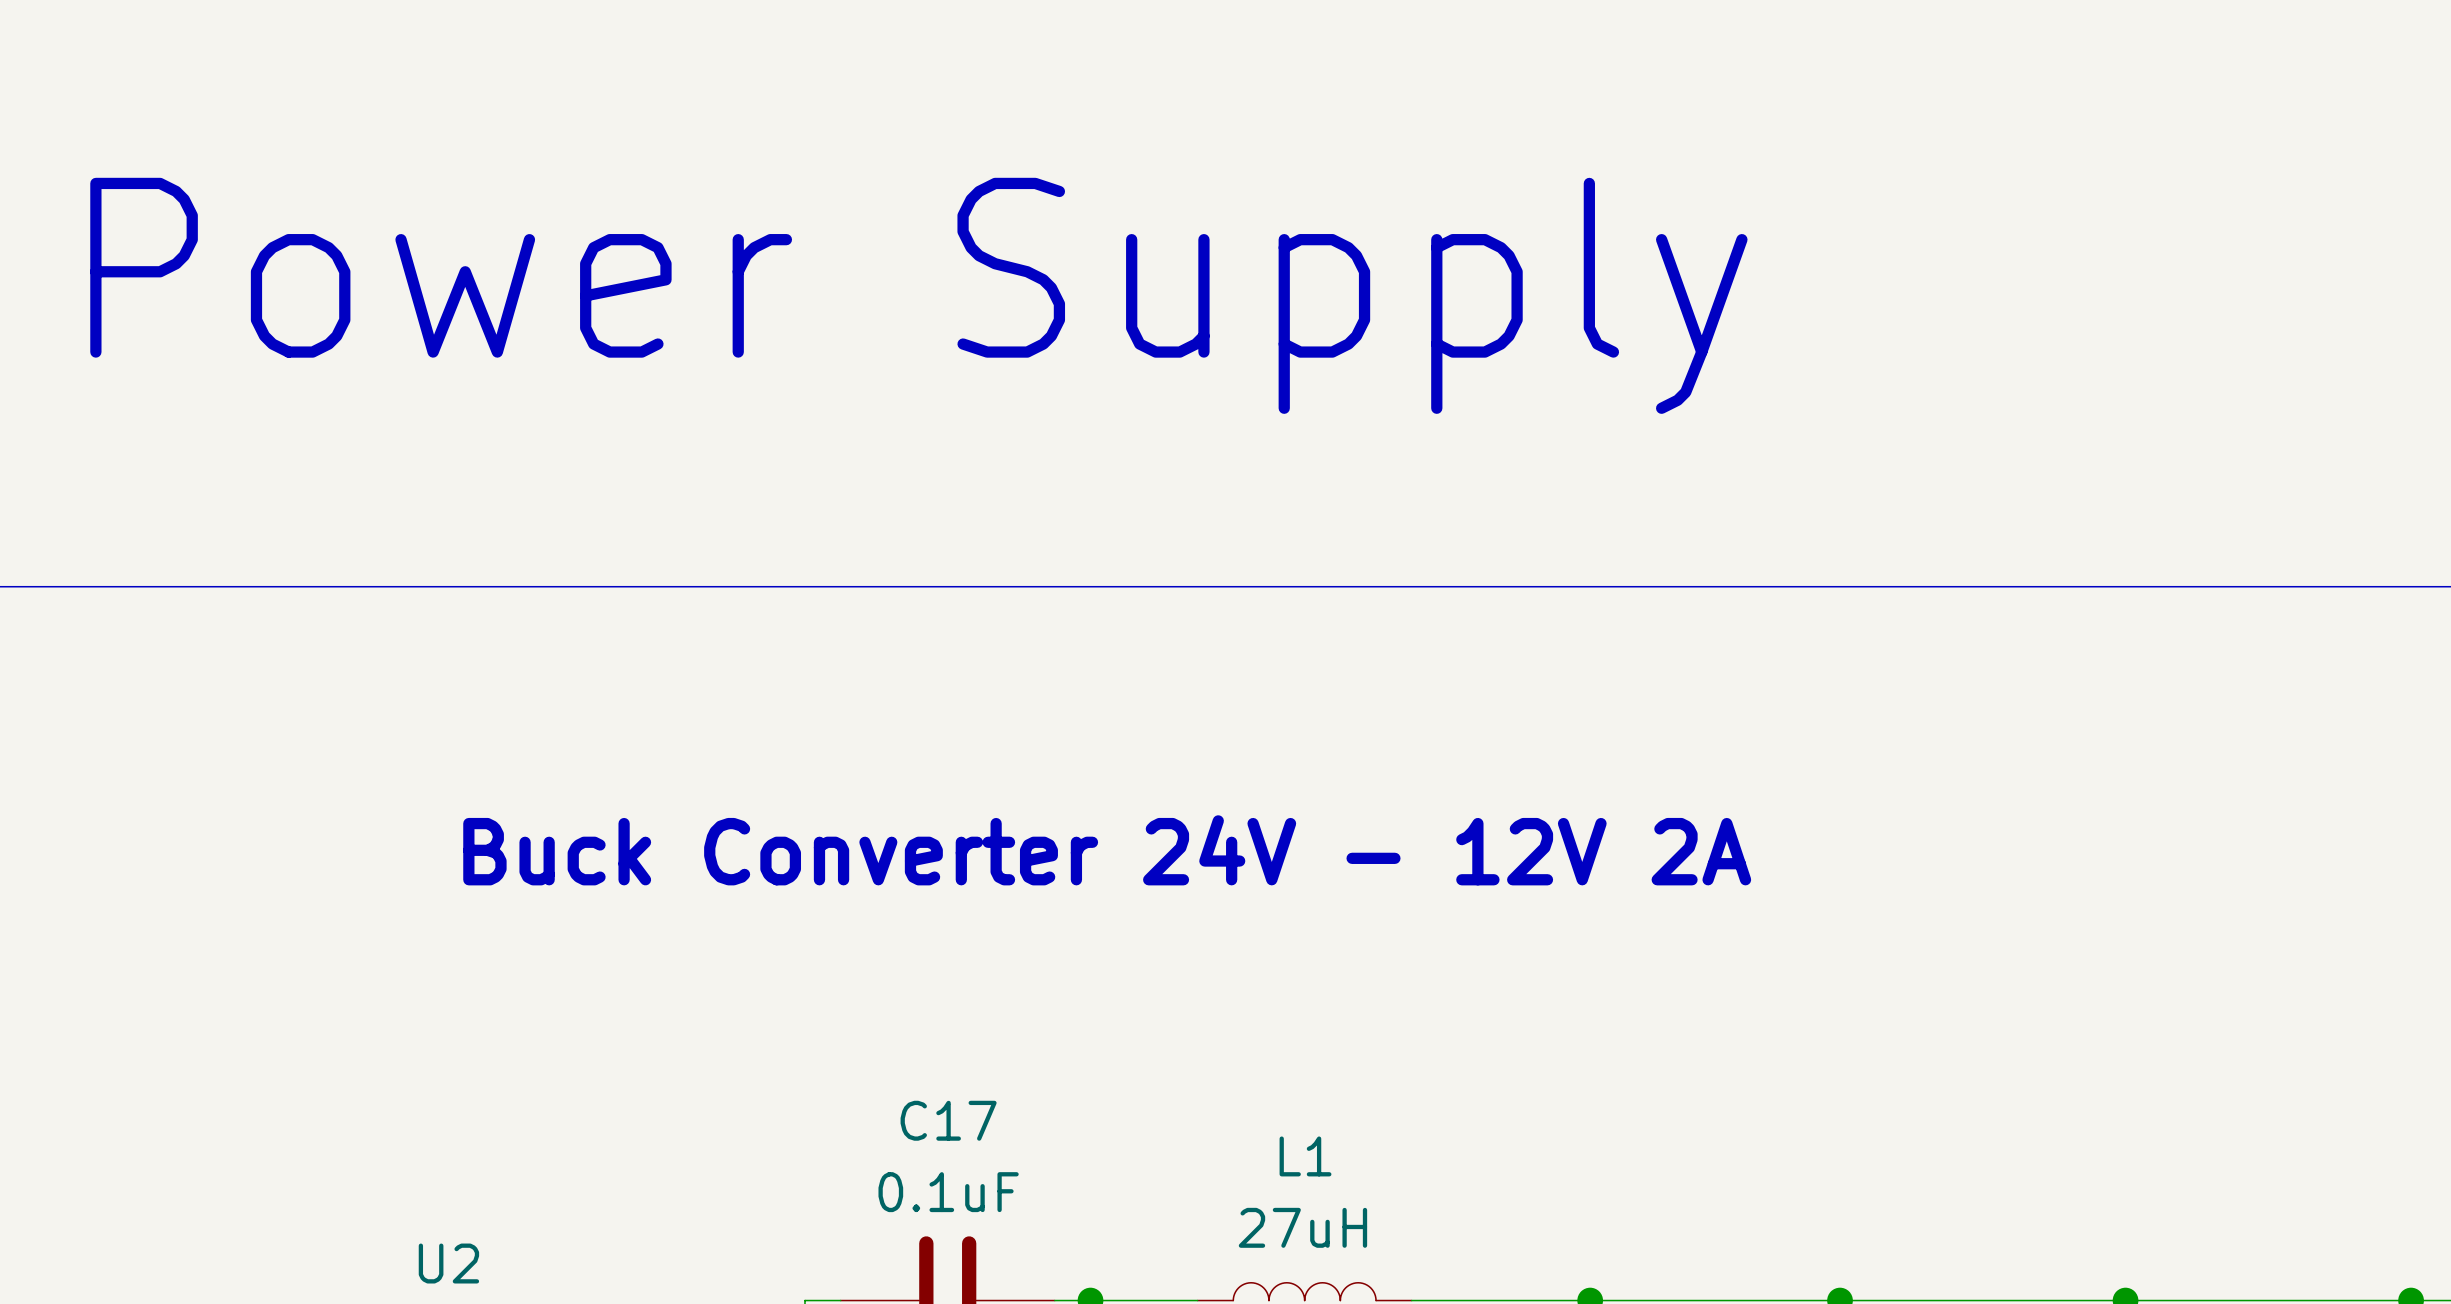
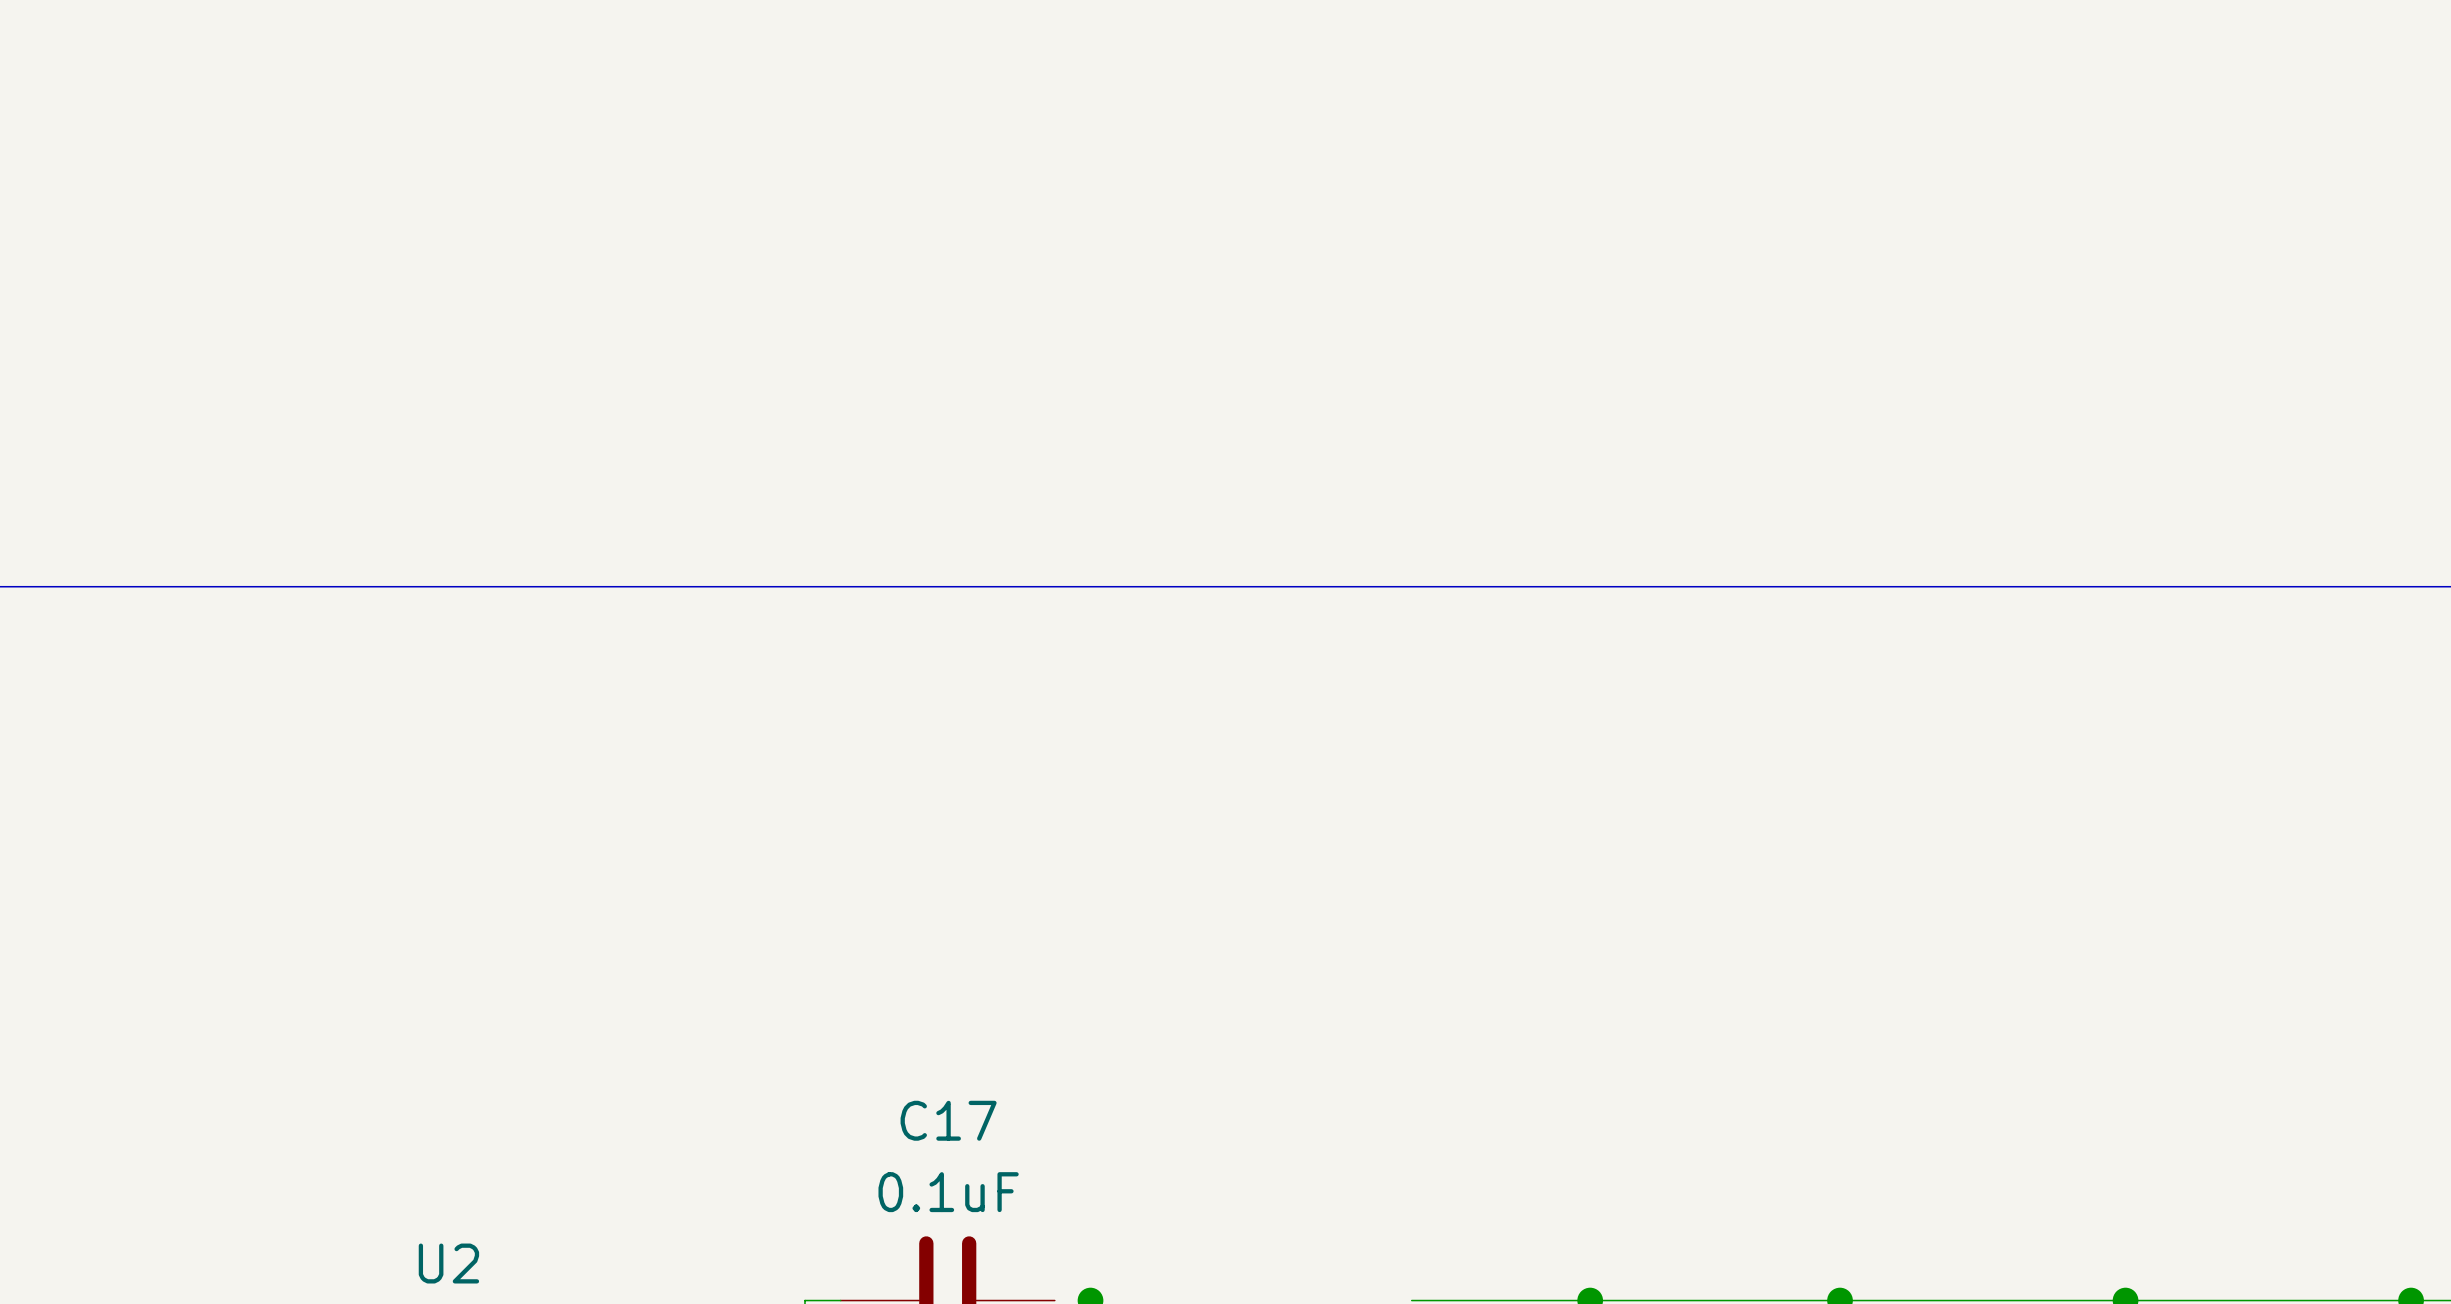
text: Power Supply (918, 295) -> none
text: Buck Converter 24V - 12V 2A (1107, 850) -> none
L1: 27uH (1304, 1291) -> none
wire: (1054, 1300) (1197, 1300) -> none

